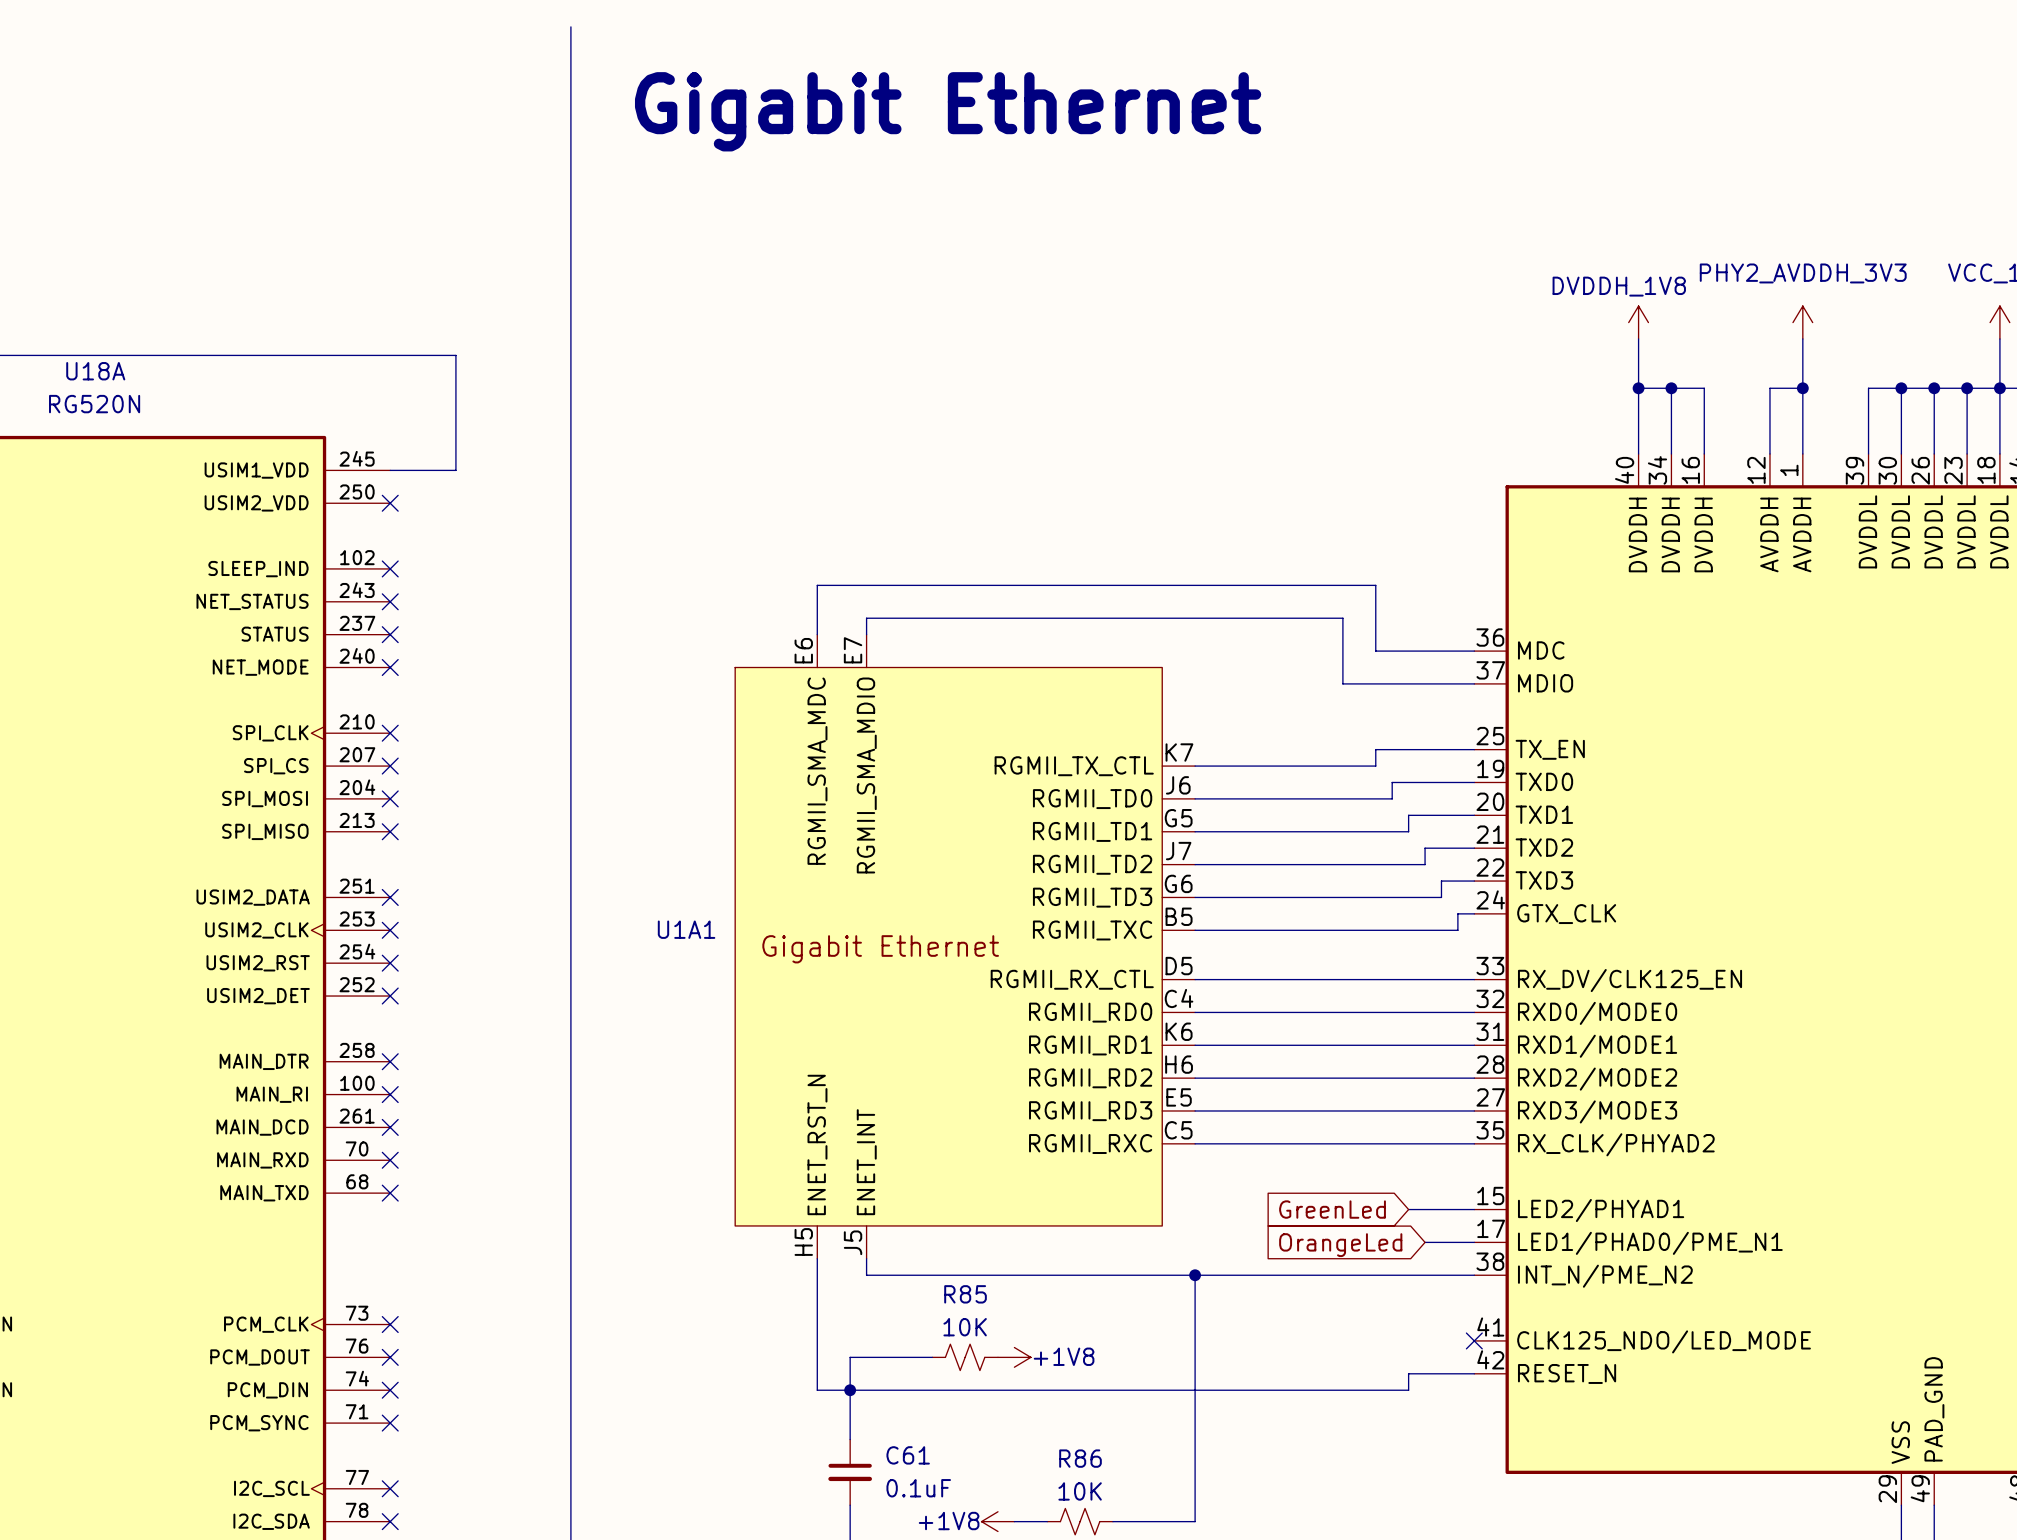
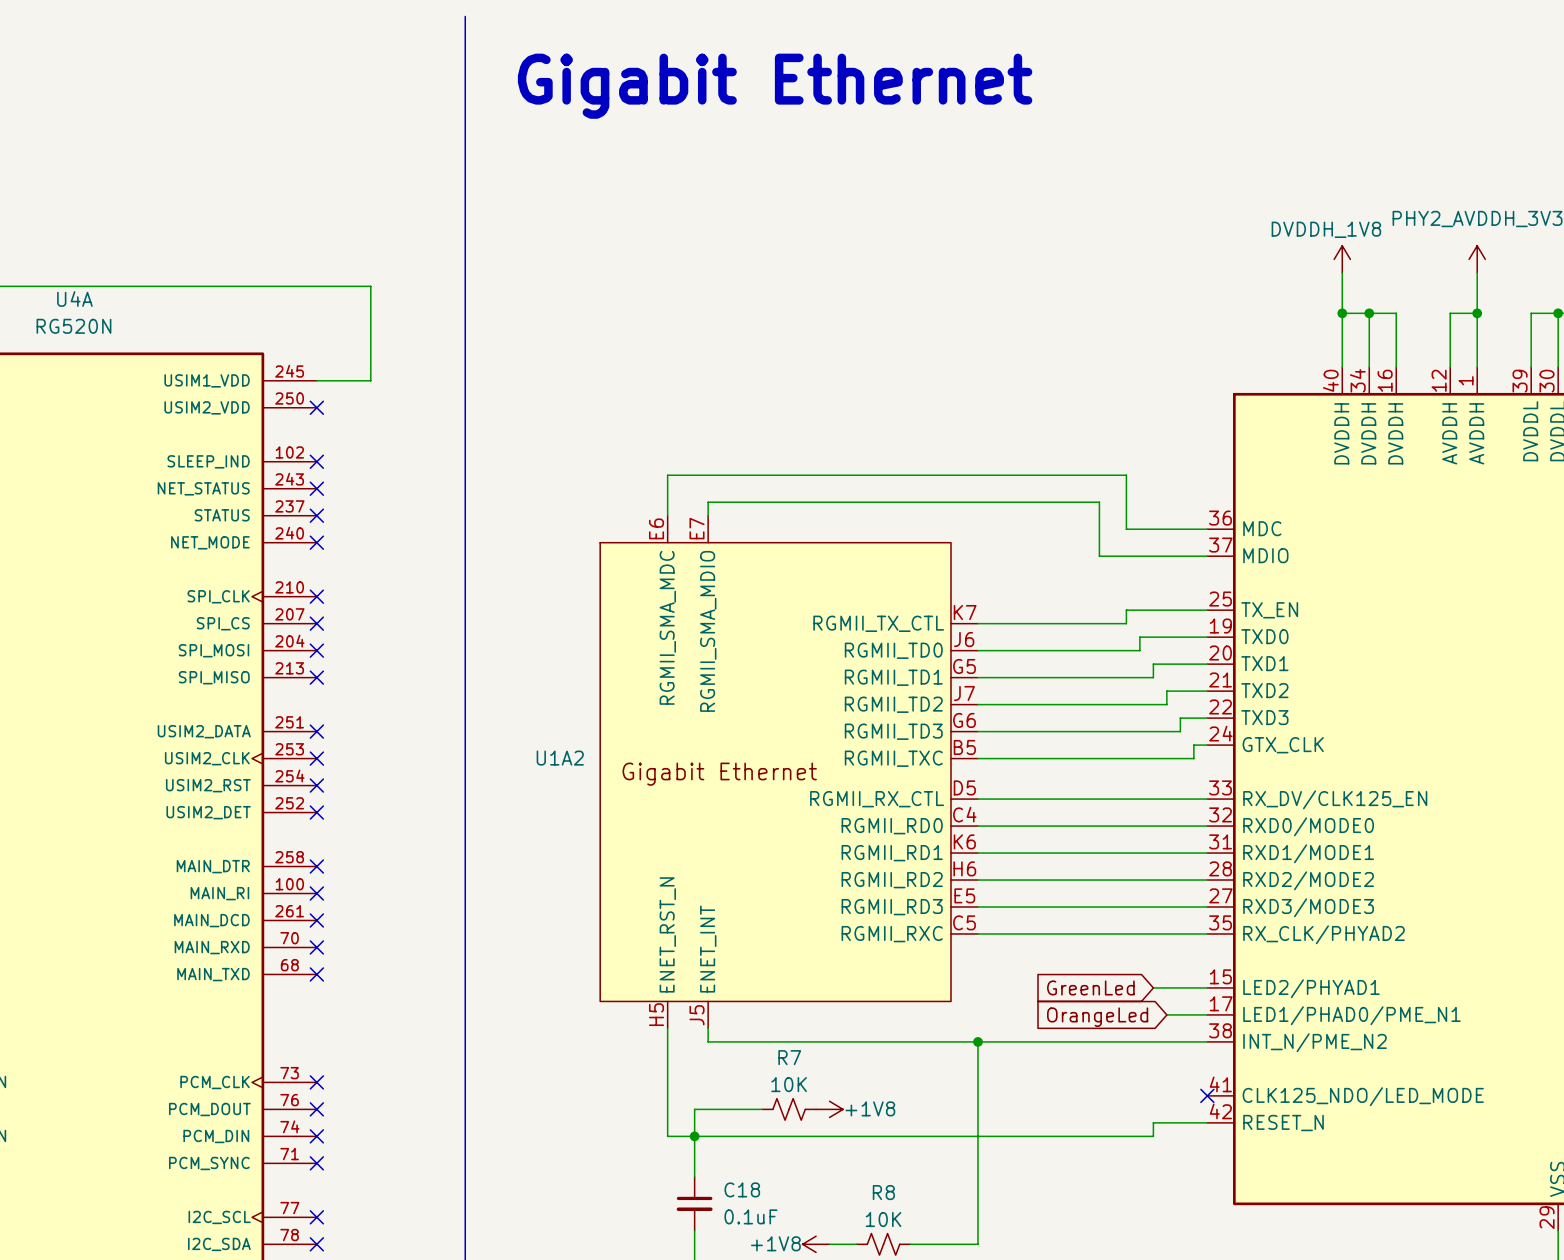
U18A name: U18A (95, 371) -> U4A (74, 299)
U1A1 name: U1A1 (686, 929) -> U1A2 (560, 758)
R85 name: R85 (965, 1294) -> R7 (789, 1057)
C61 name: C61 (908, 1455) -> C18 (742, 1189)
R86 name: R86 (1080, 1458) -> R8 (883, 1192)

